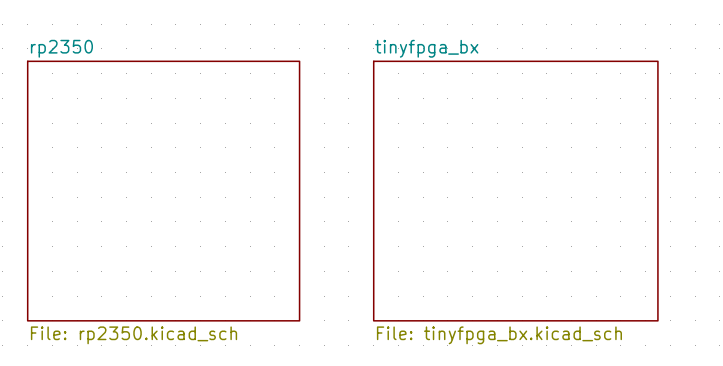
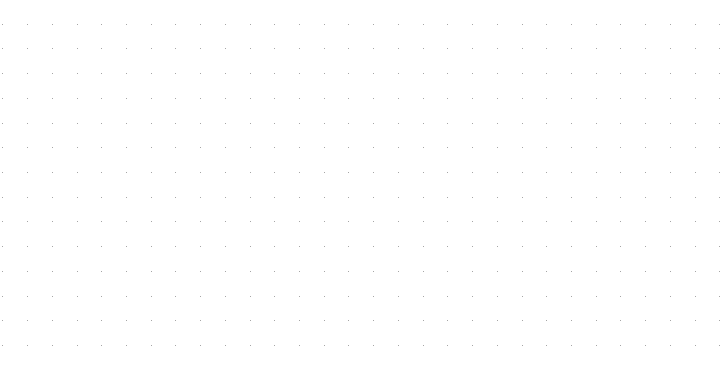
sheet rp2350: File: rp2350.kicad_sch (163, 191) -> none
sheet tinyfpga_bx: File: tinyfpga_bx.kicad_sch (515, 191) -> none

